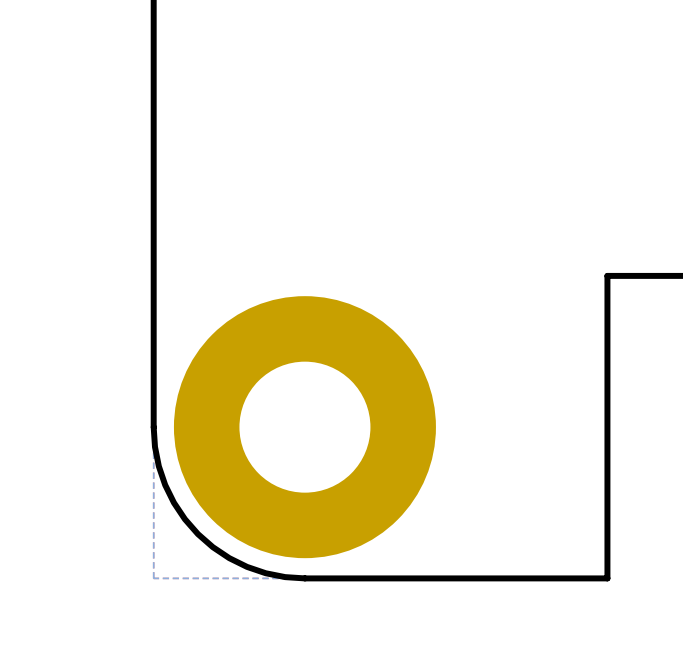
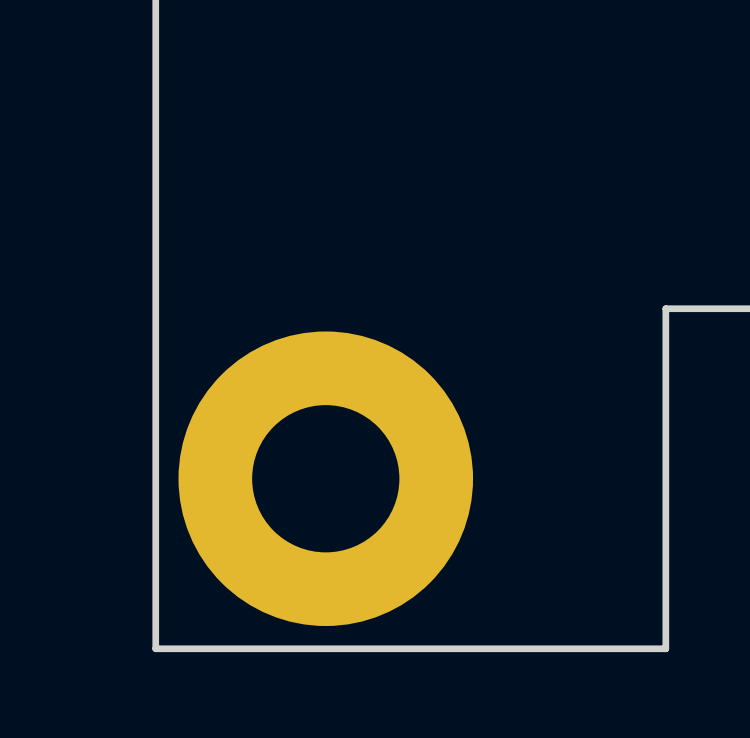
board edge: (153, 427) (154, 446) (165, 485) (173, 502) (197, 534) (212, 547) (247, 566) (285, 577) (304, 578) -> (155, 478) (155, 648) (325, 648)

